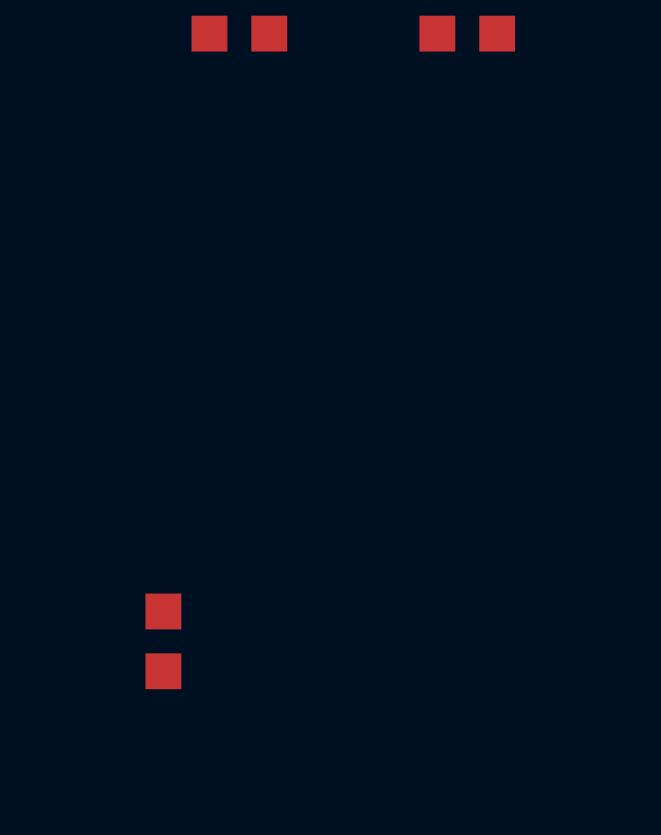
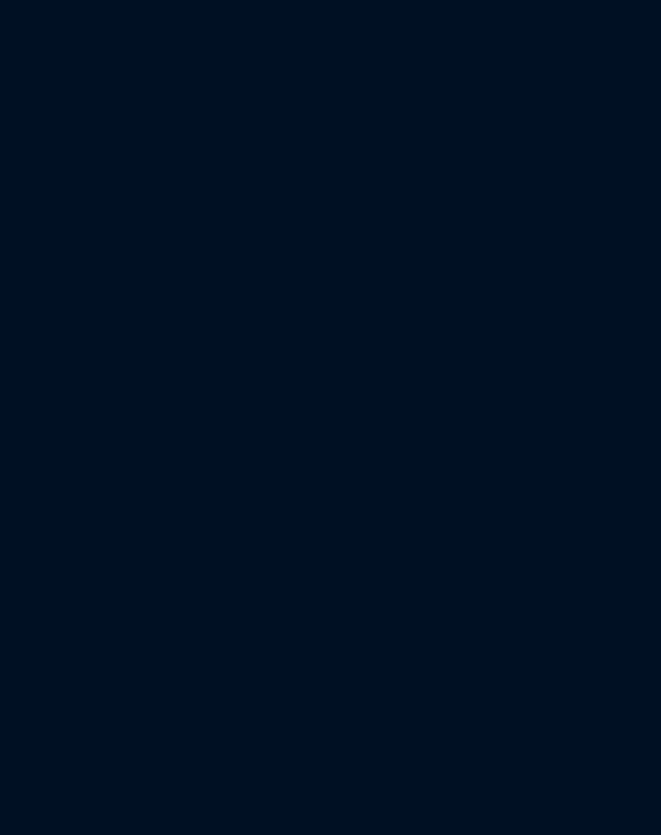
part: (239, 33) -> none
part: (467, 33) -> none
part: (163, 641) -> none

